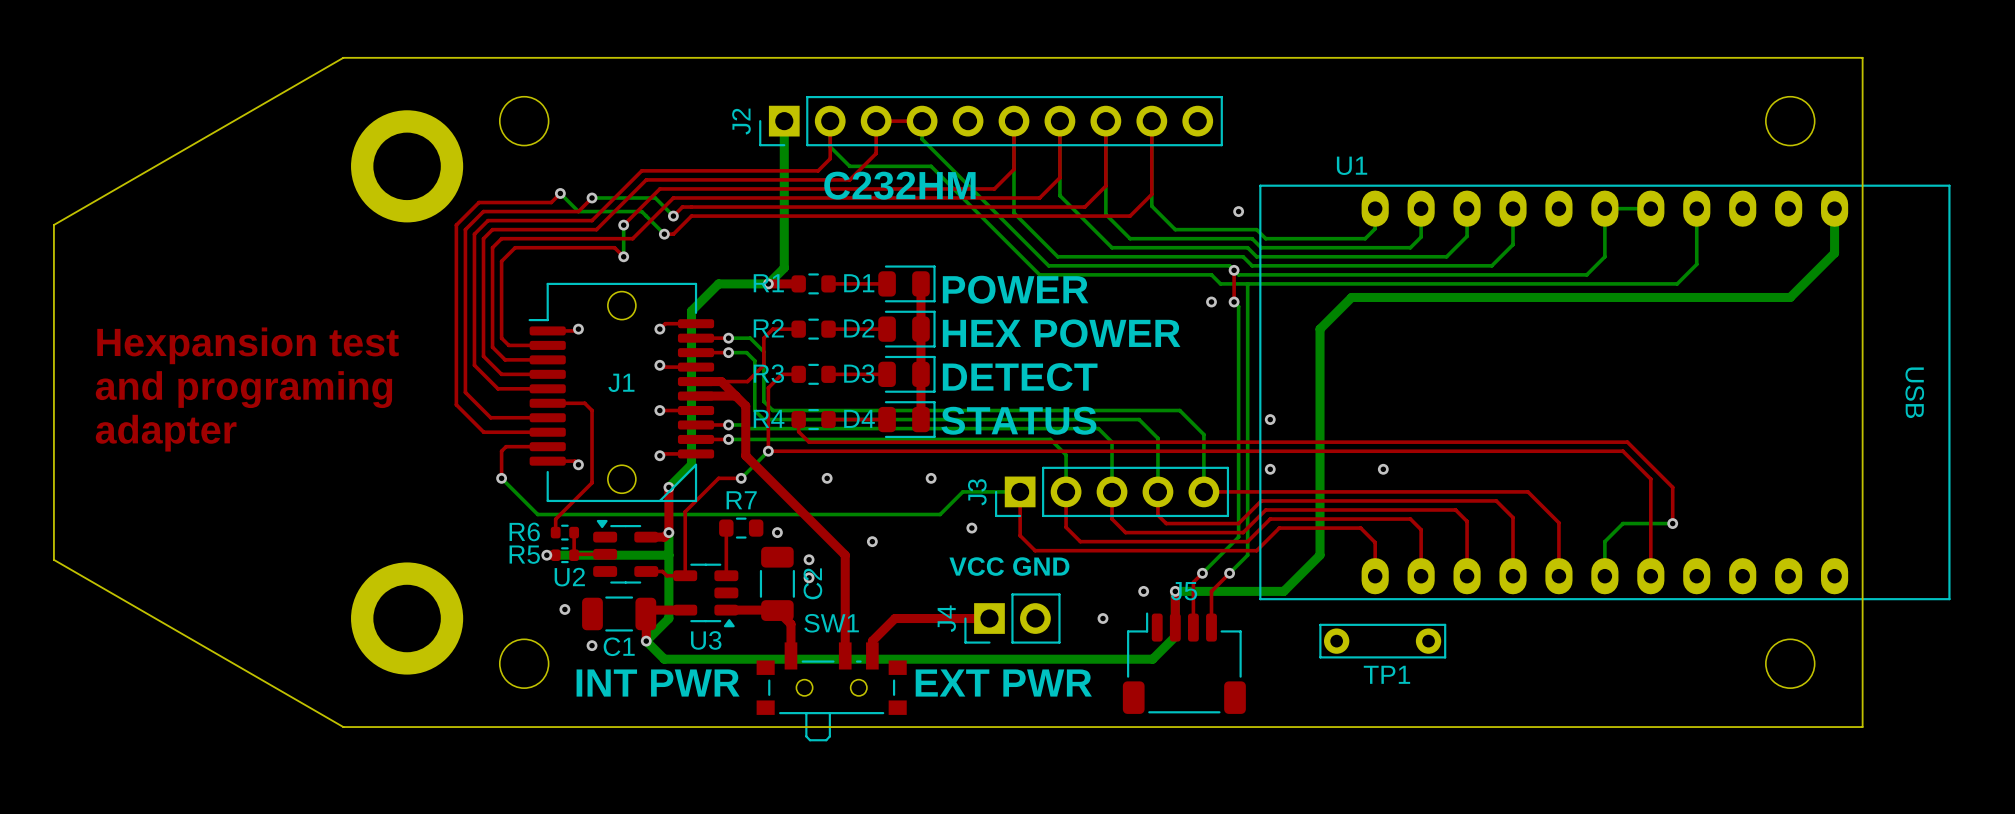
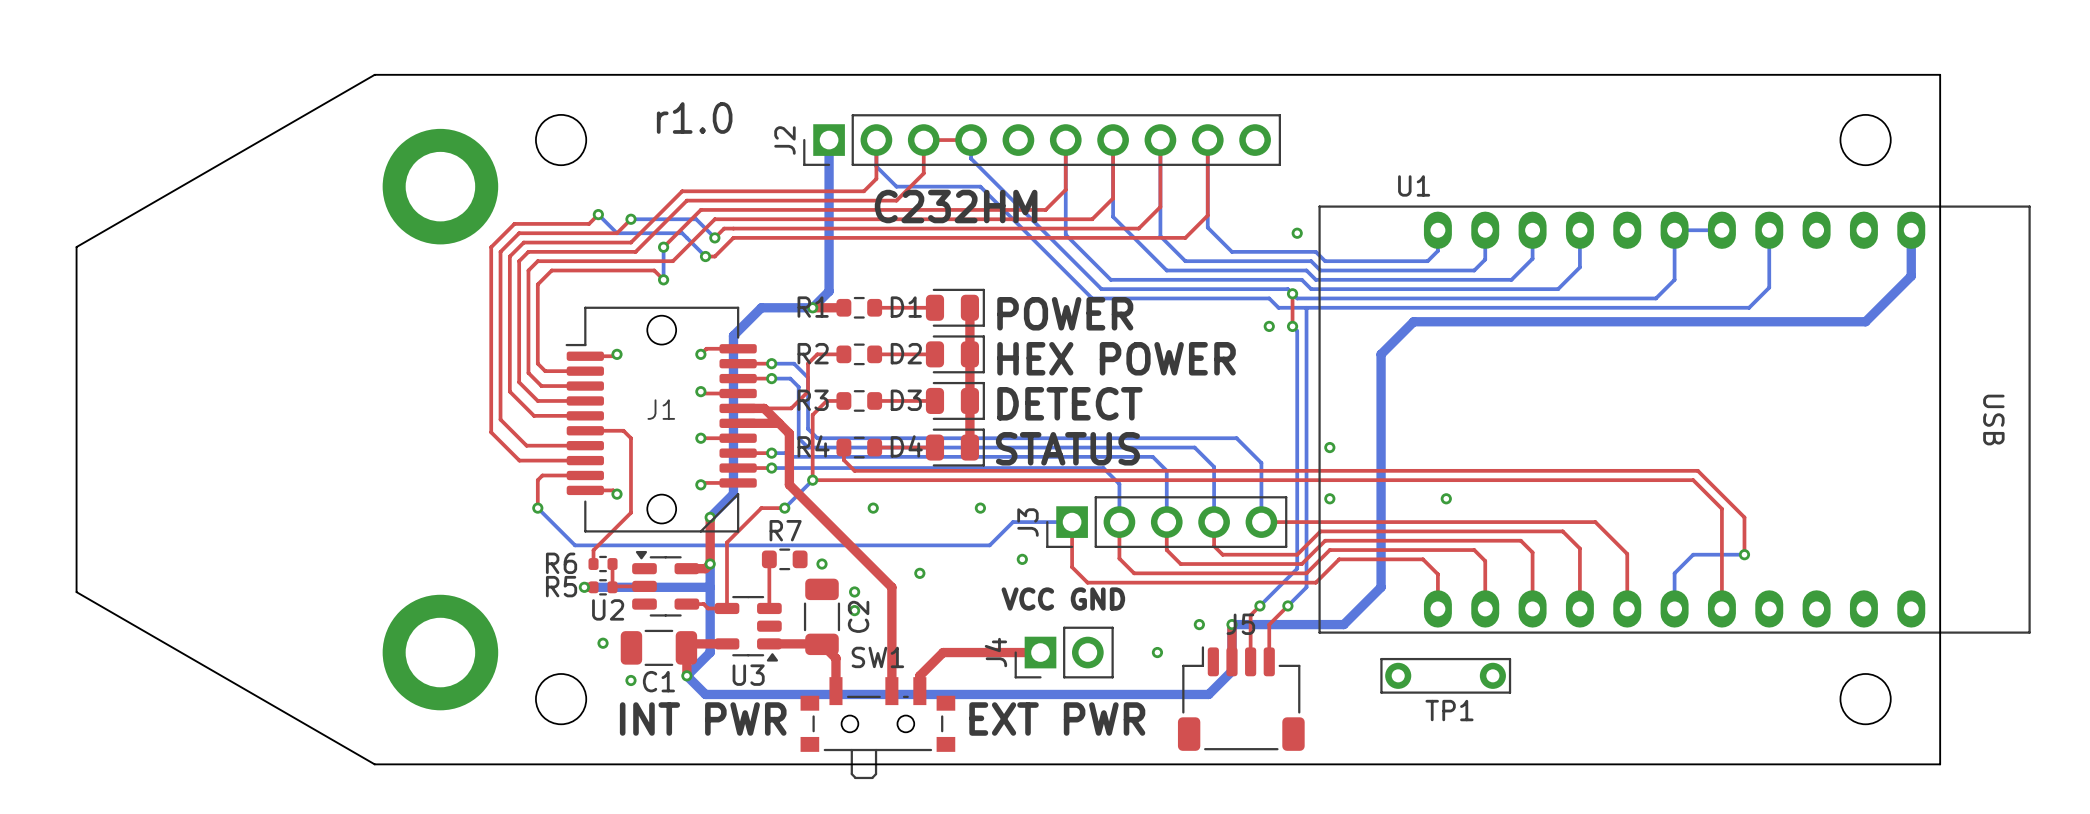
text: none -> r1.0 (694, 118)
text: Hexpansion test (248, 345) -> none
text: and programing (243, 389) -> none
text: adapter (166, 433) -> none

